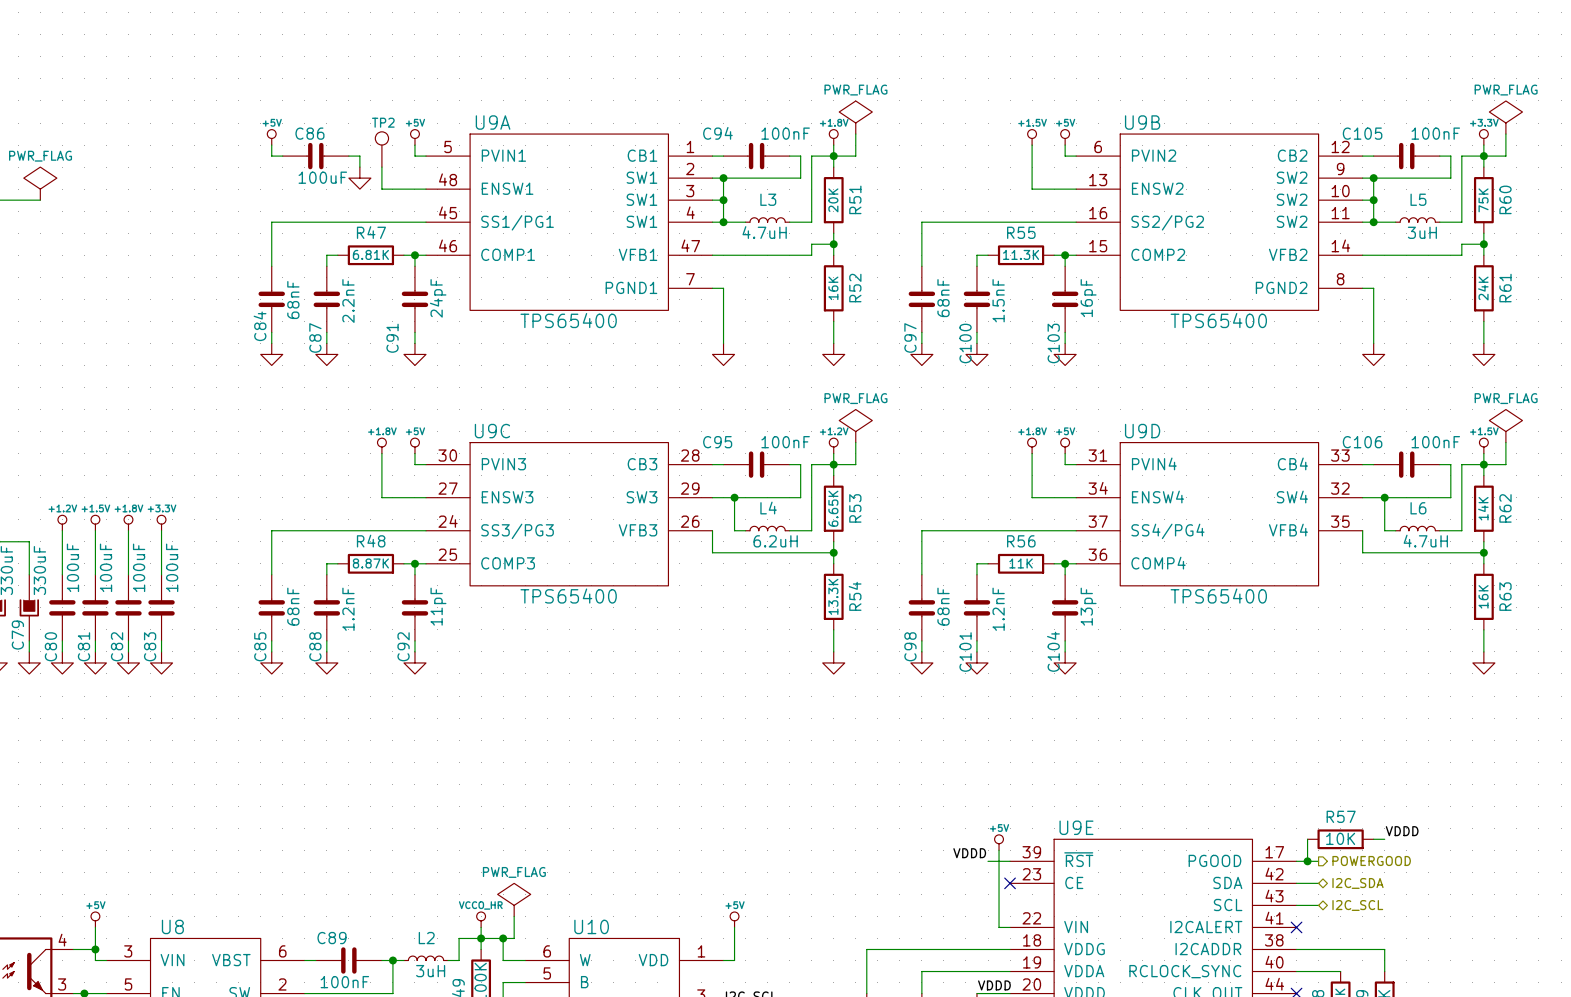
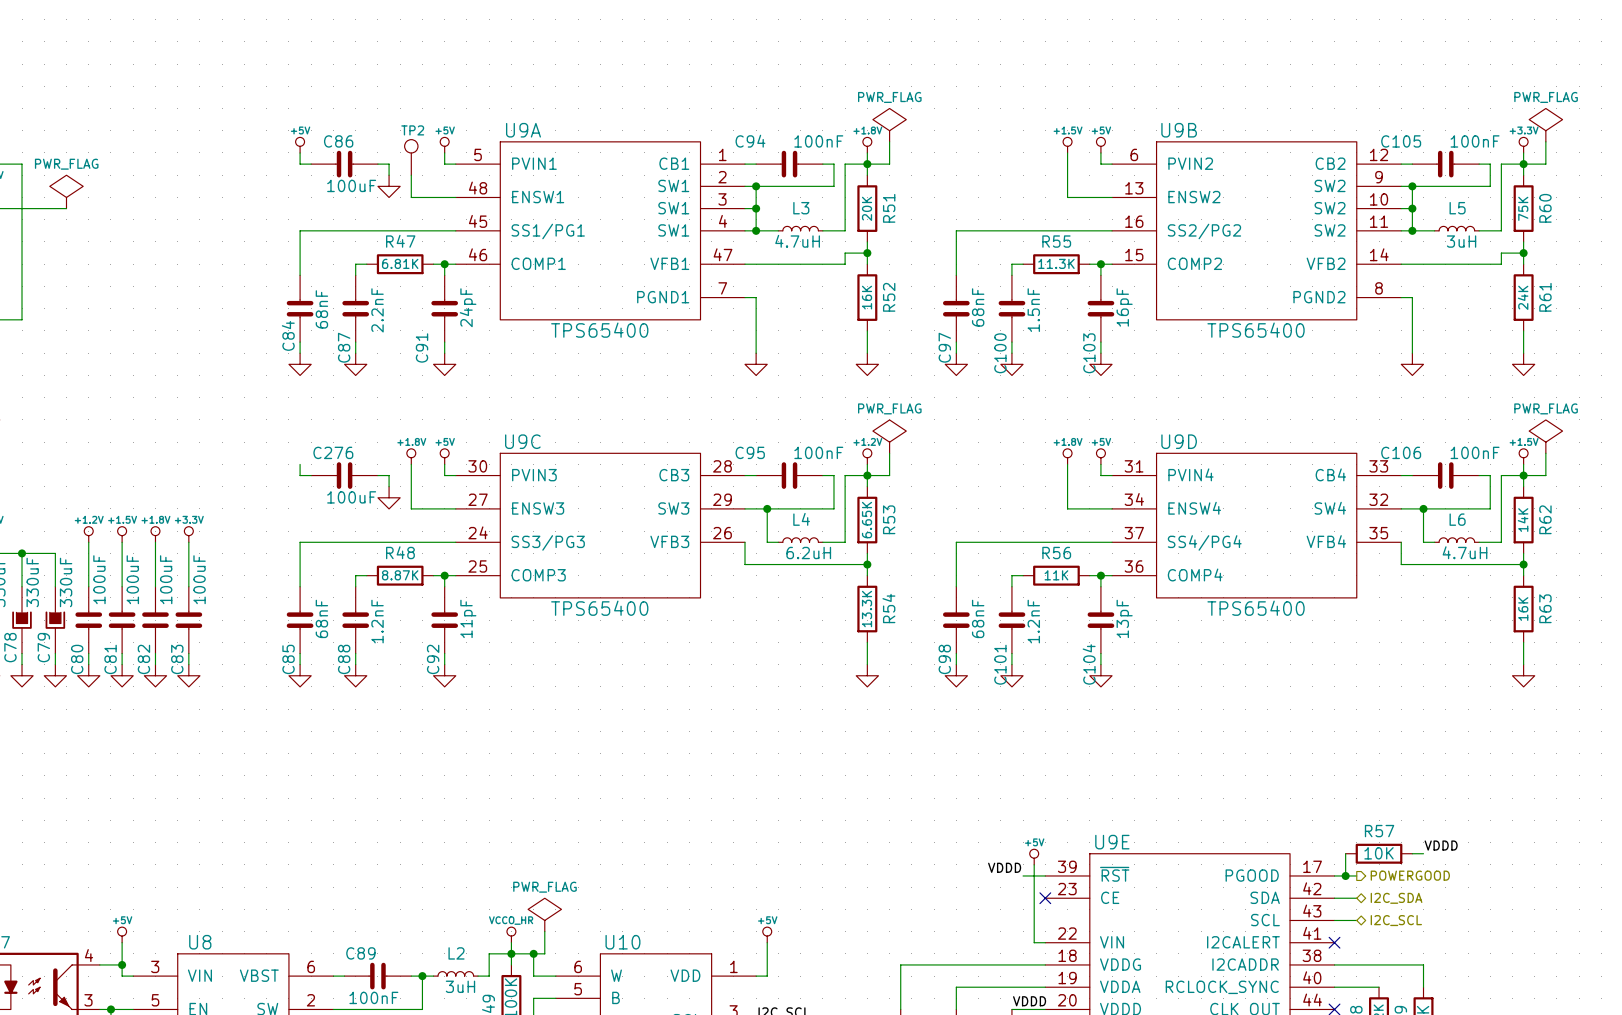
wire: none -> (300, 464) (300, 475) (311, 475)
C276: none -> 100uF (344, 475)
wire: none -> (377, 475) (389, 475) (389, 486)
power symbol: none -> (389, 497)

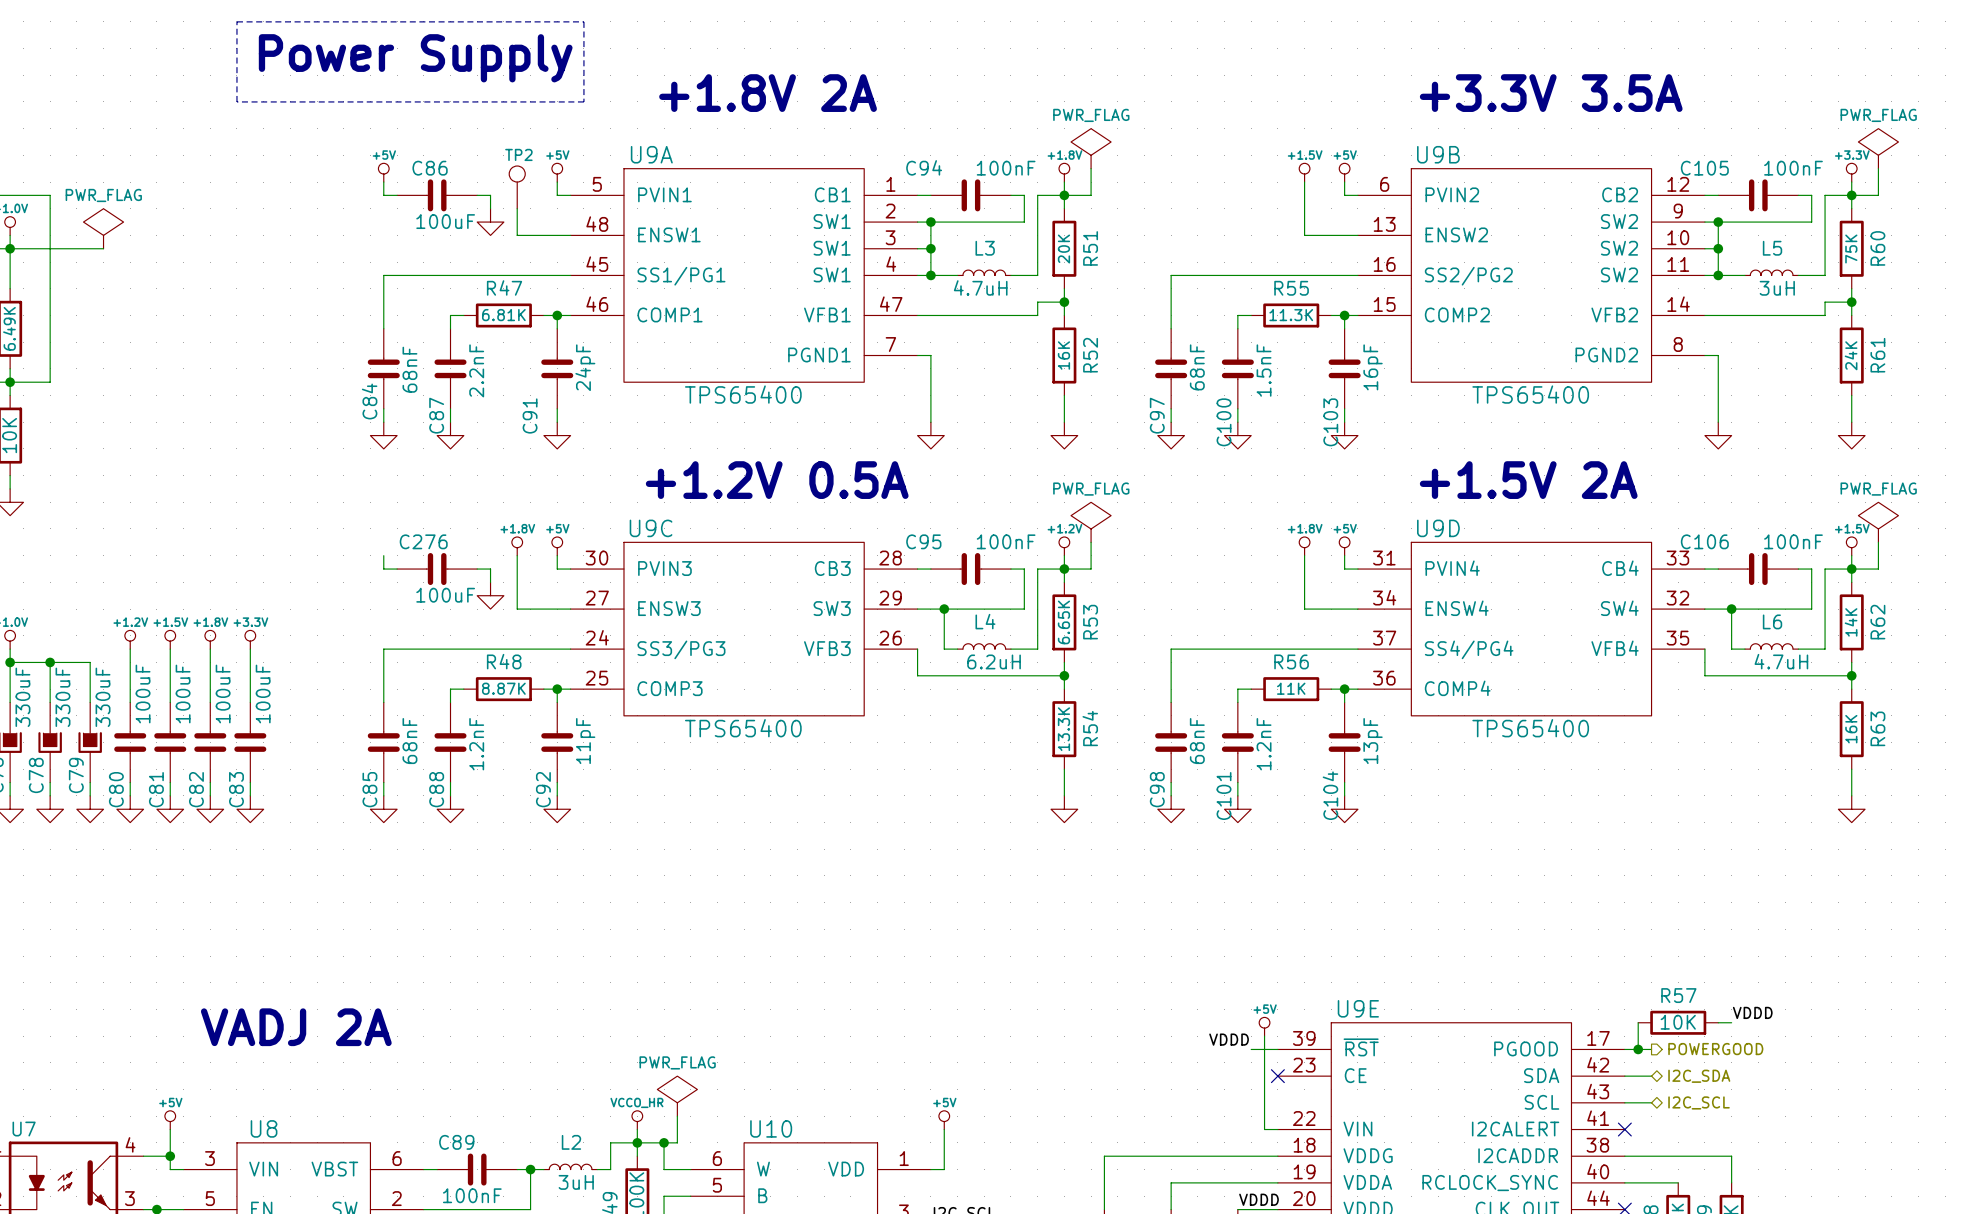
line: none -> (236, 21) (583, 21) (583, 101) (236, 101) (236, 21)
text: none -> Power Supply (415, 58)
text: none -> +1.8V 2A (768, 93)
text: none -> +3.3V 3.5A (1551, 93)
text: none -> +1.2V 0.5A (777, 480)
text: none -> +1.5V 2A (1528, 480)
text: none -> VADJ 2A (296, 1027)

